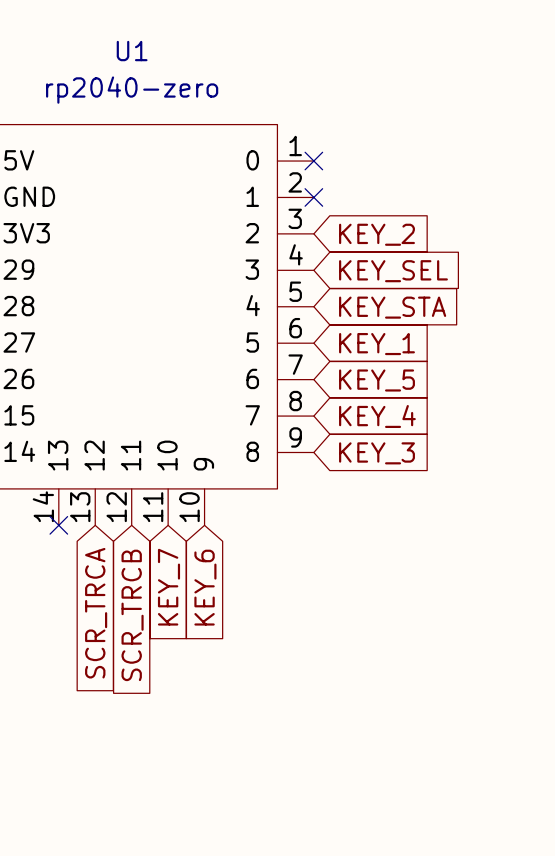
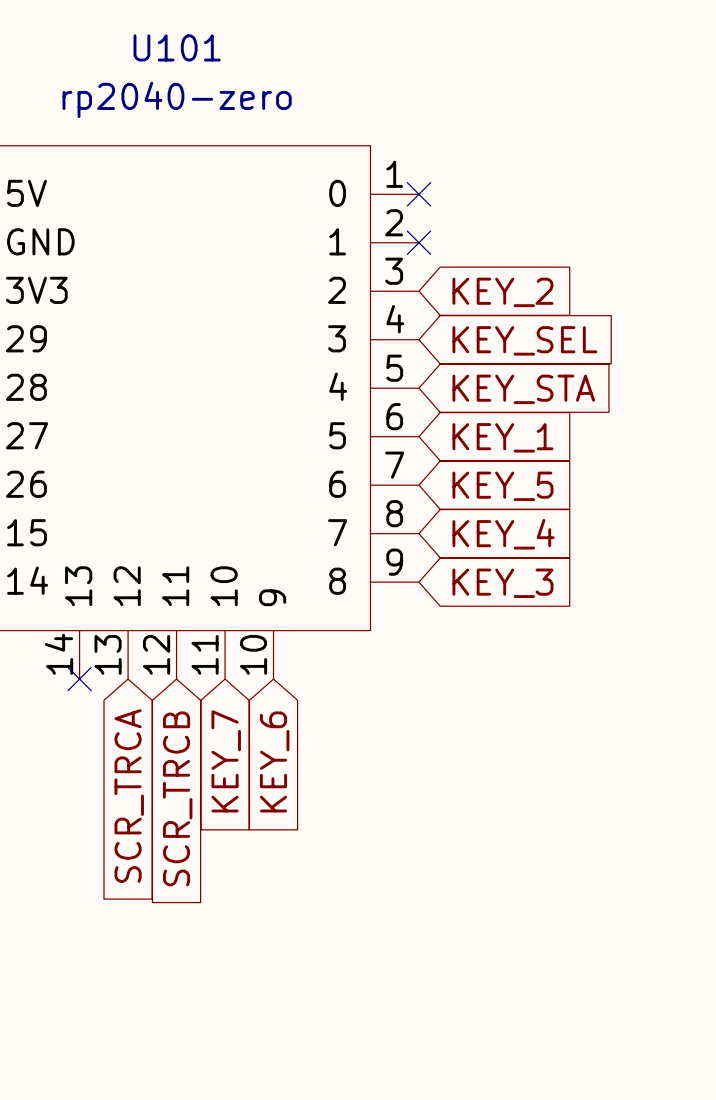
U1 name: U1 (132, 51) -> U101 (177, 47)

